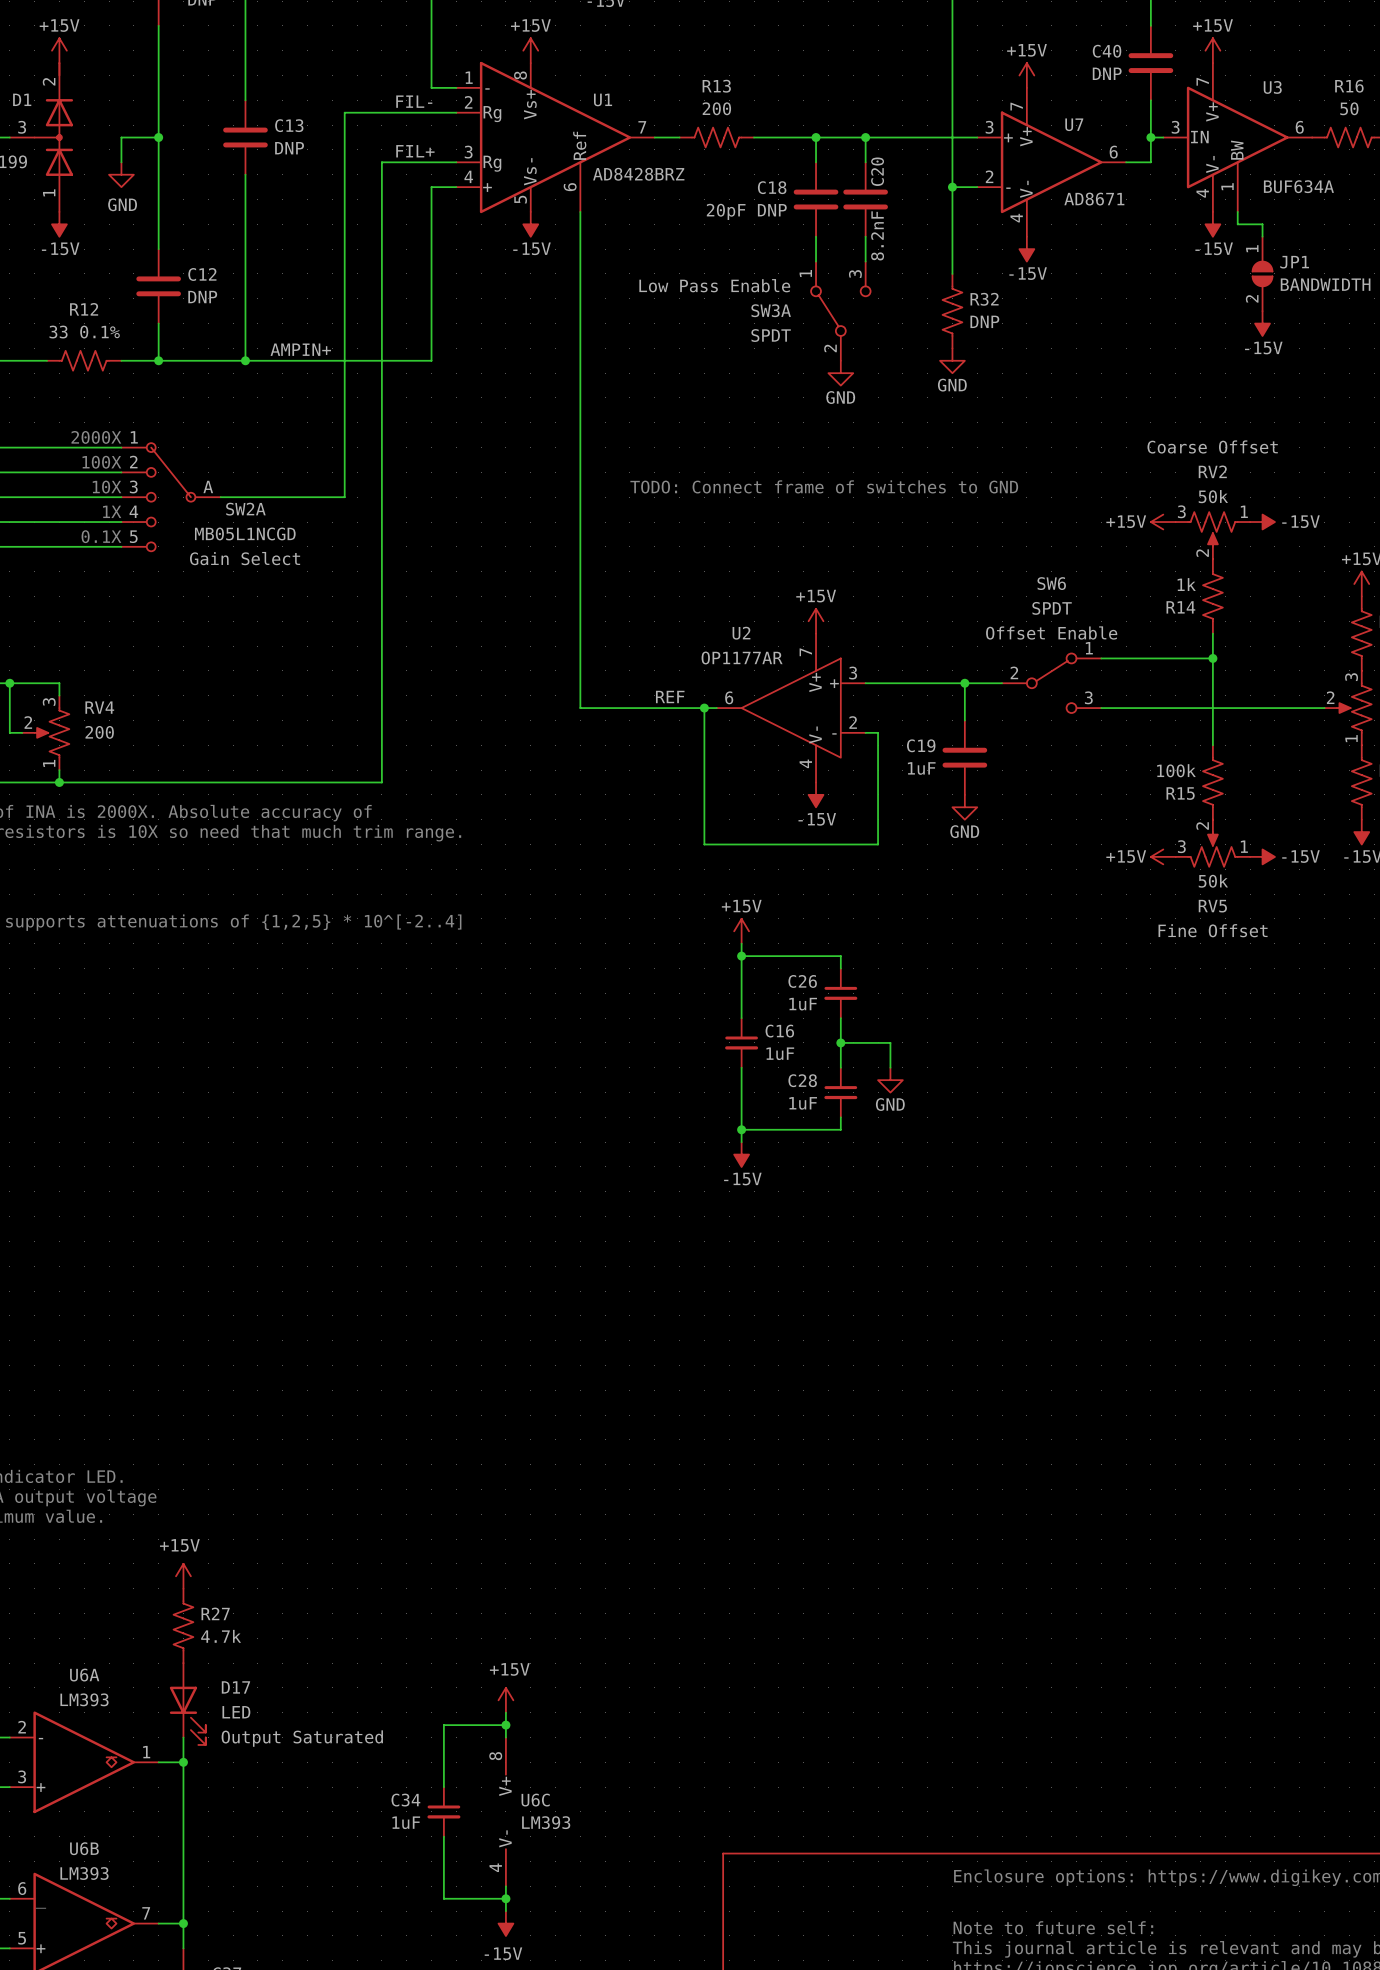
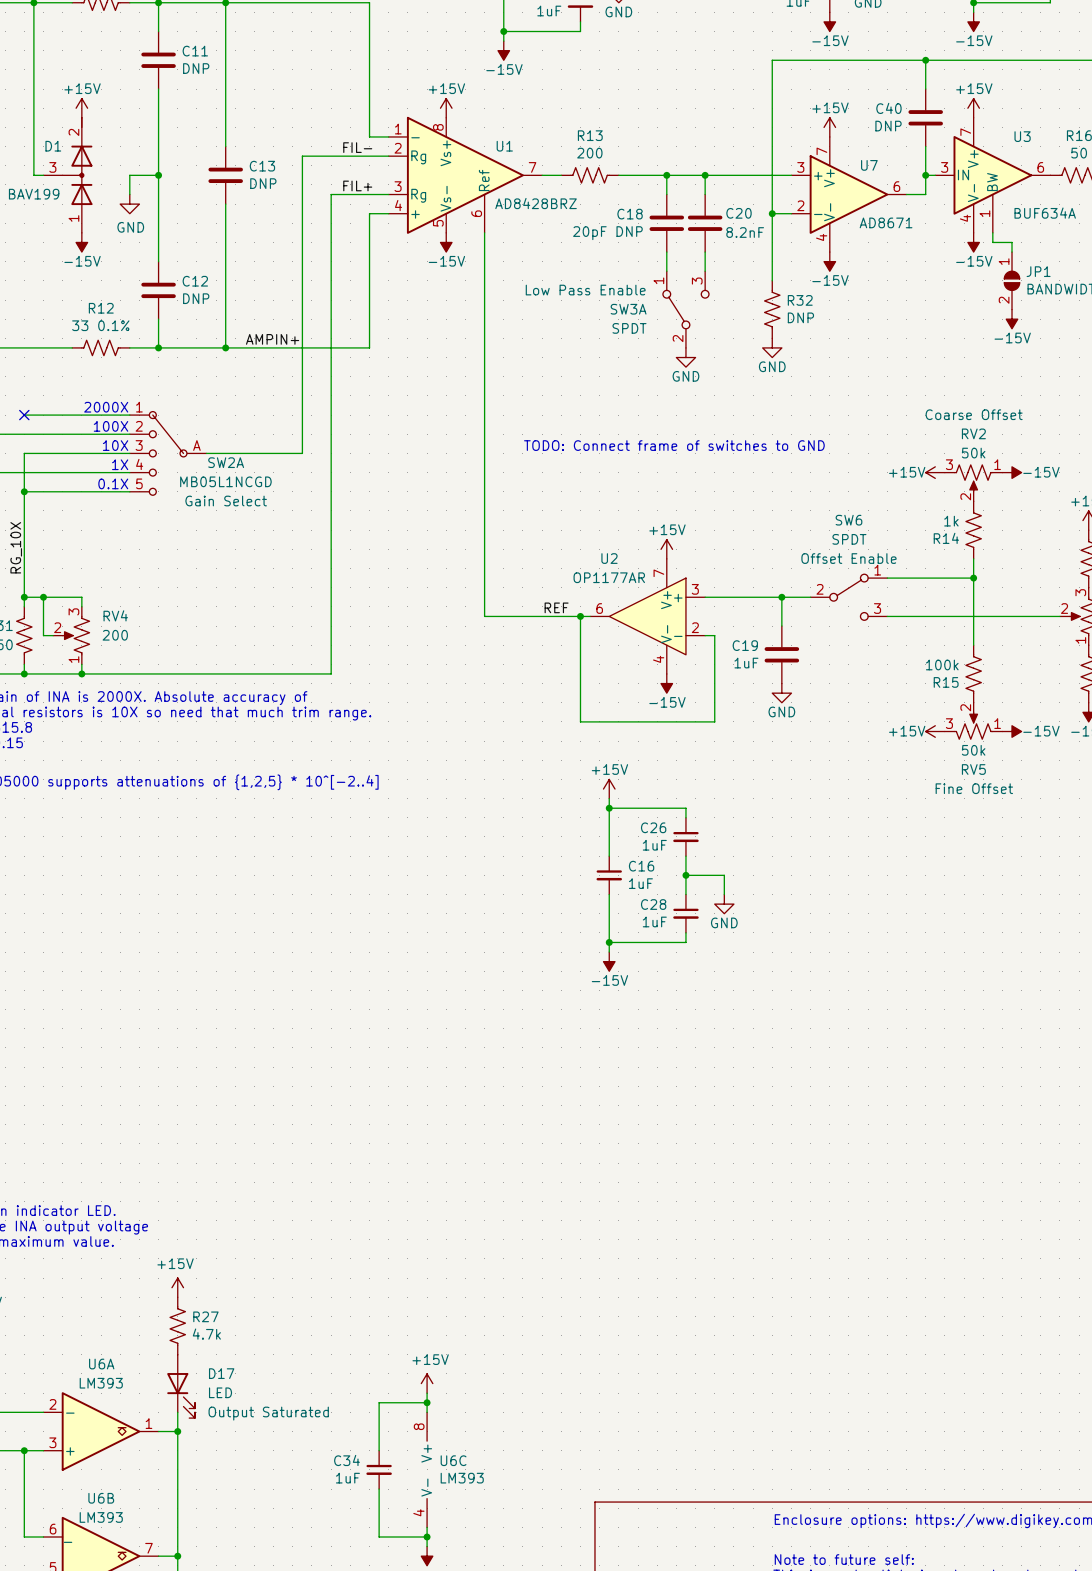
C20 name rotation: 0° (877, 171) -> 90° clockwise (739, 213)
C20 value rotation: 0° (877, 235) -> 90° clockwise (745, 232)

